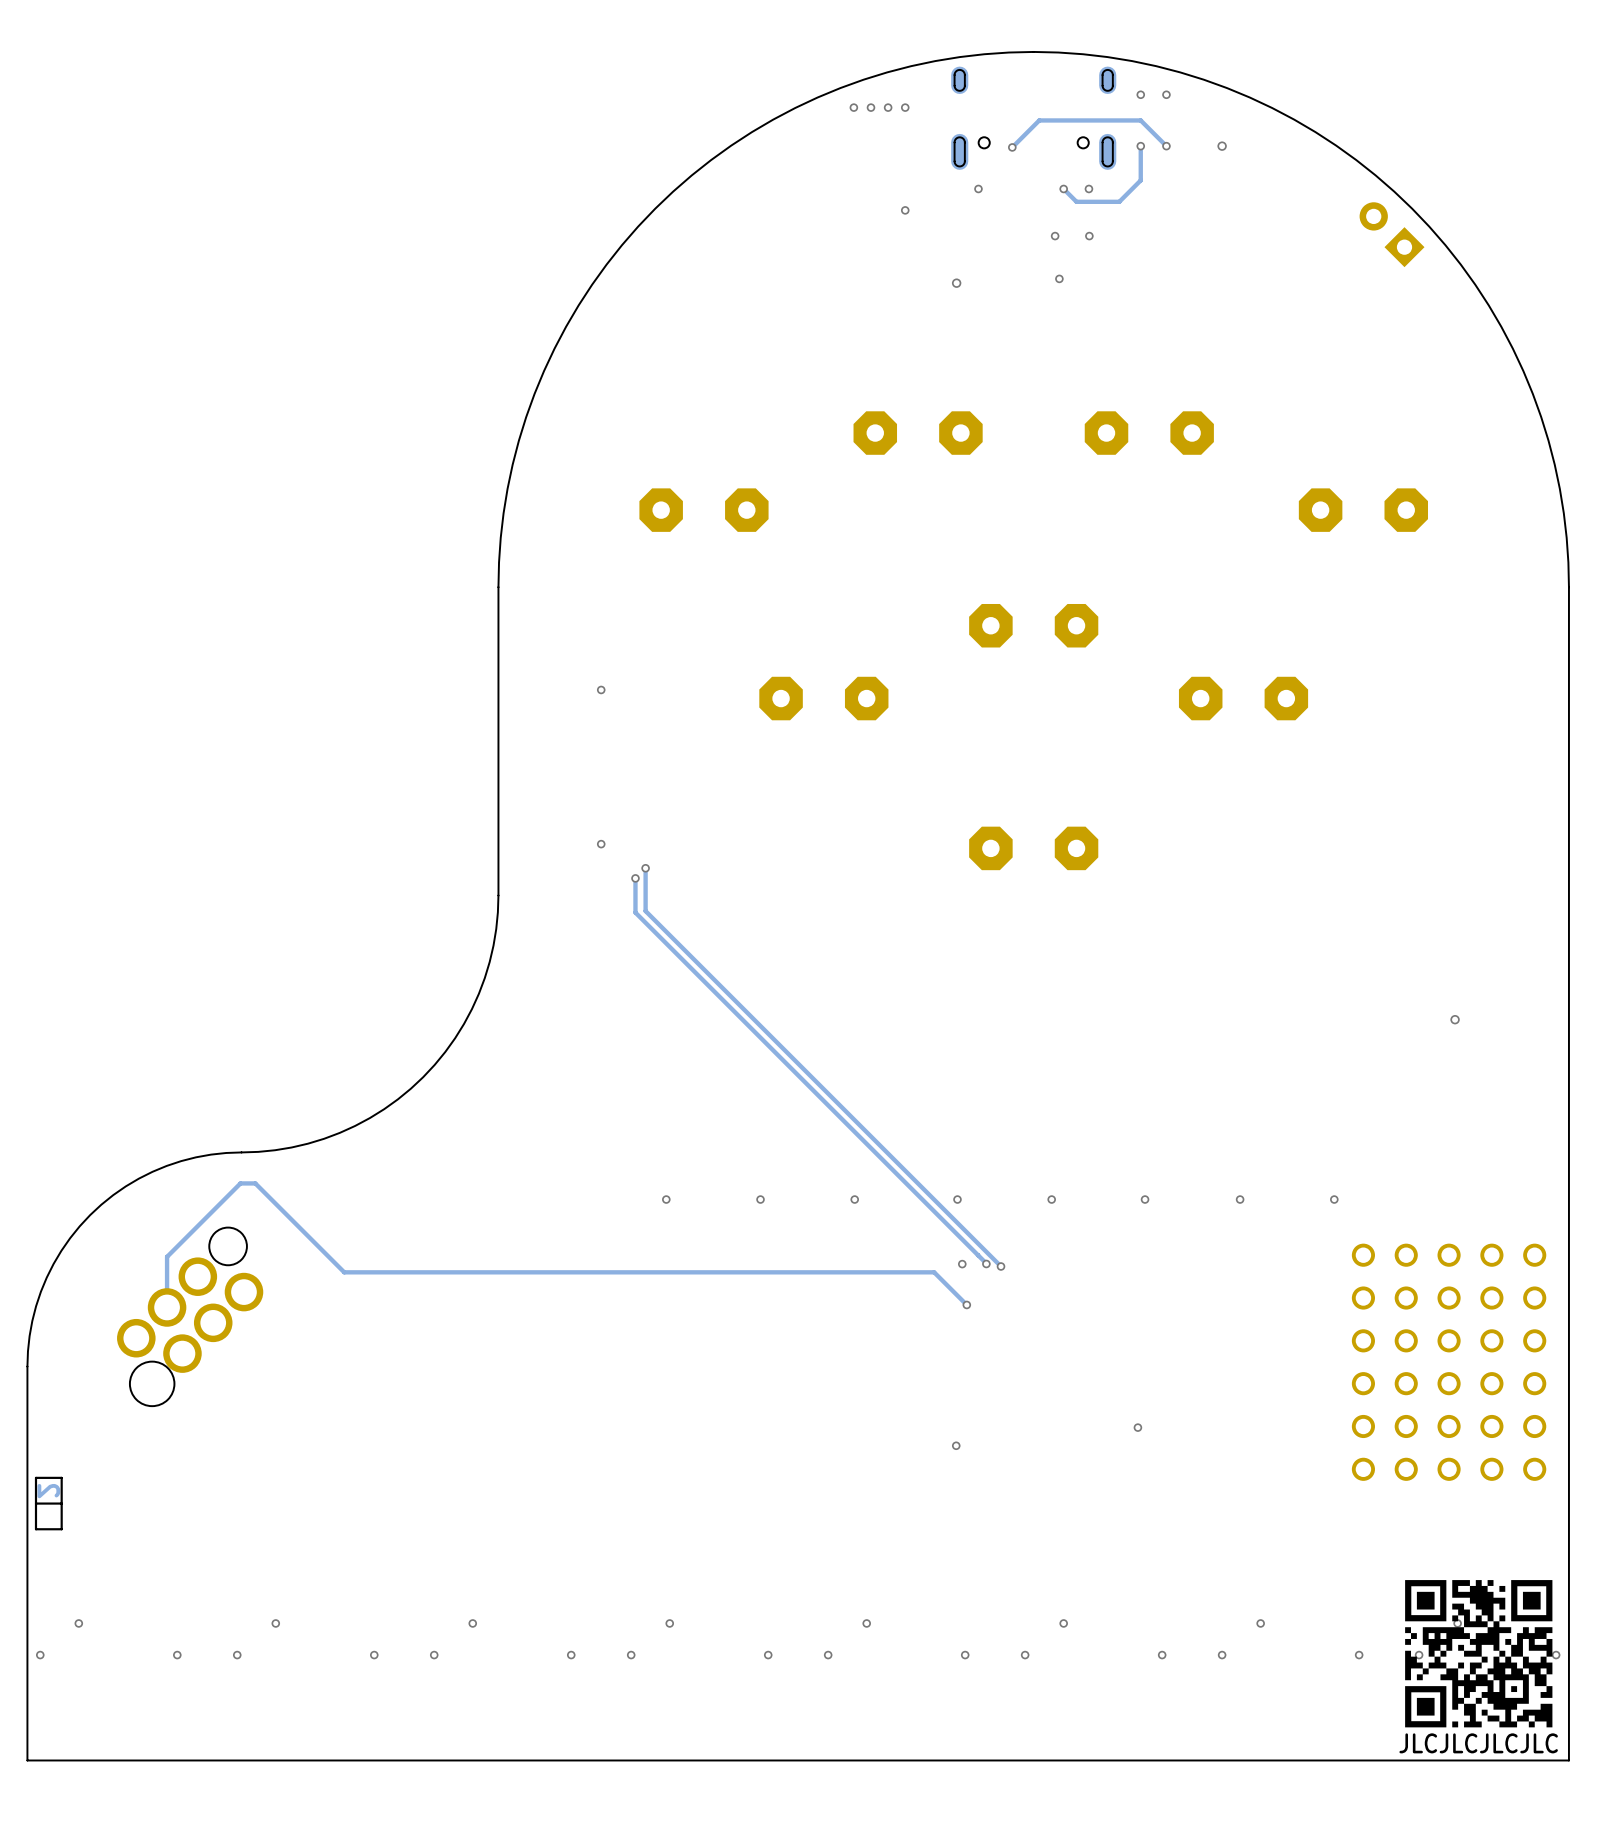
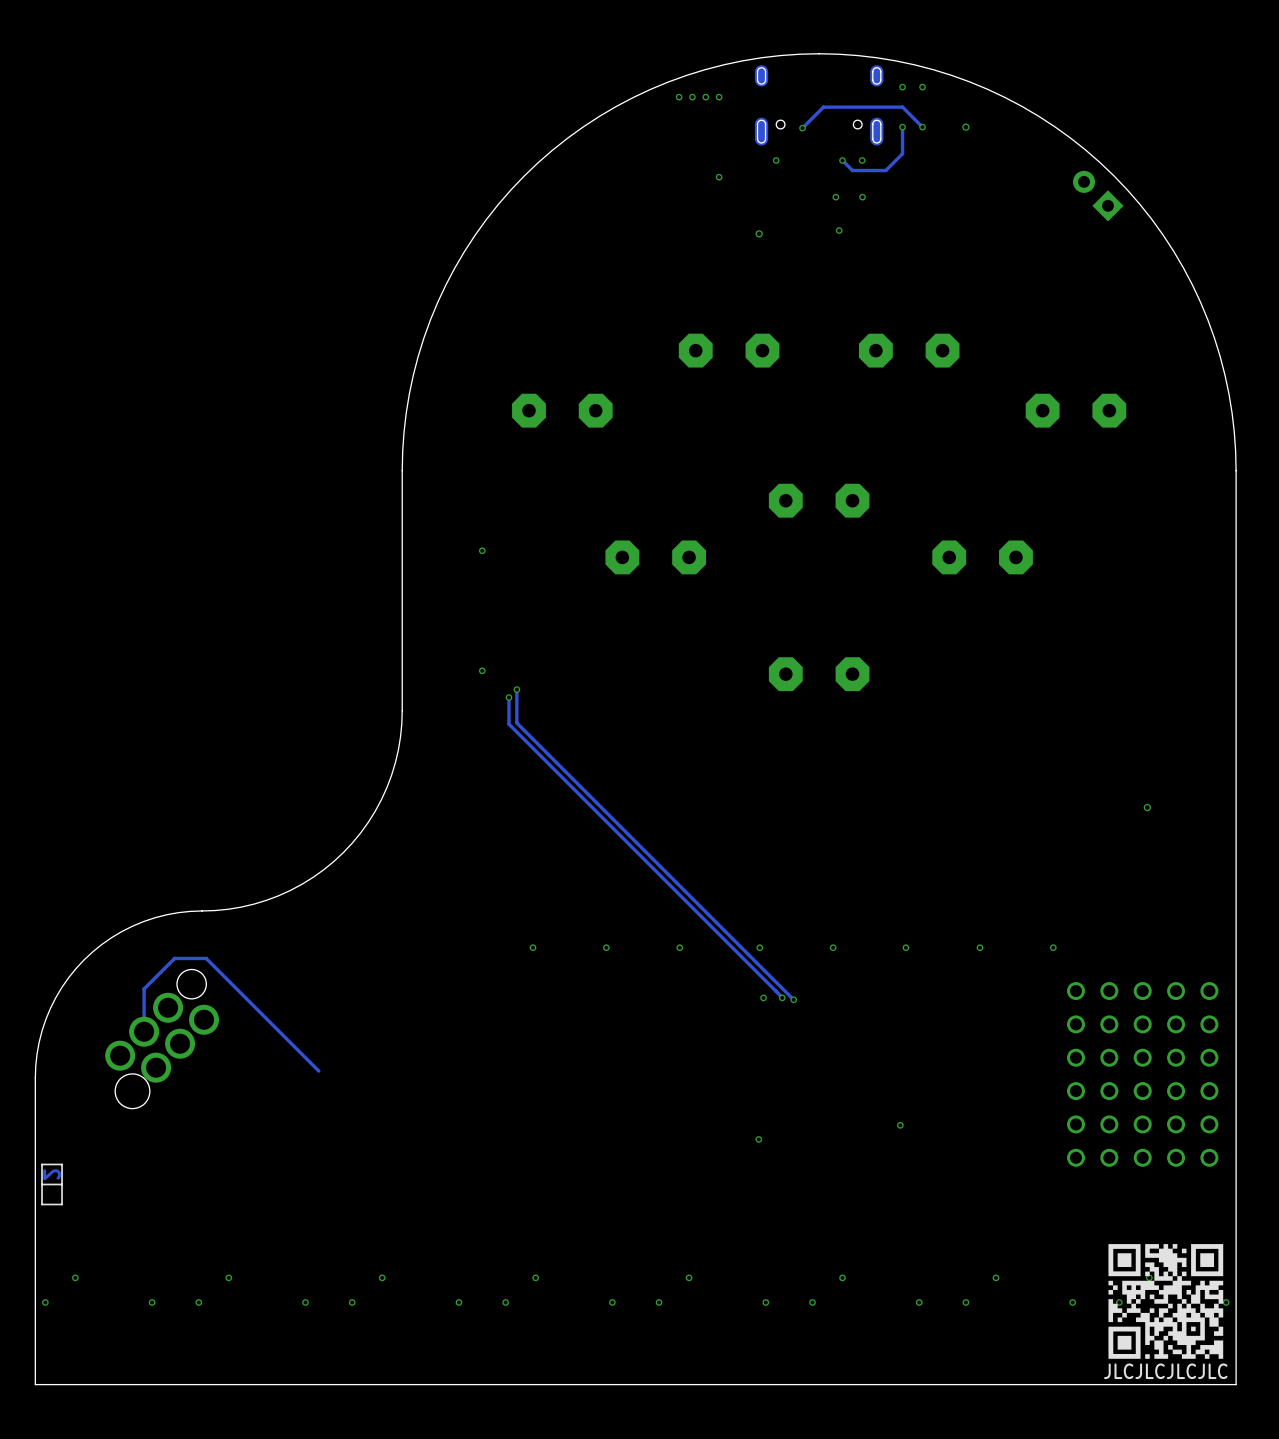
track: (167, 1256) (240, 1183) (255, 1183) (344, 1272) (934, 1272) (966, 1304) -> (144, 992) (144, 988) (174, 958) (206, 958) (318, 1071)
via: (966, 1304) -> none

